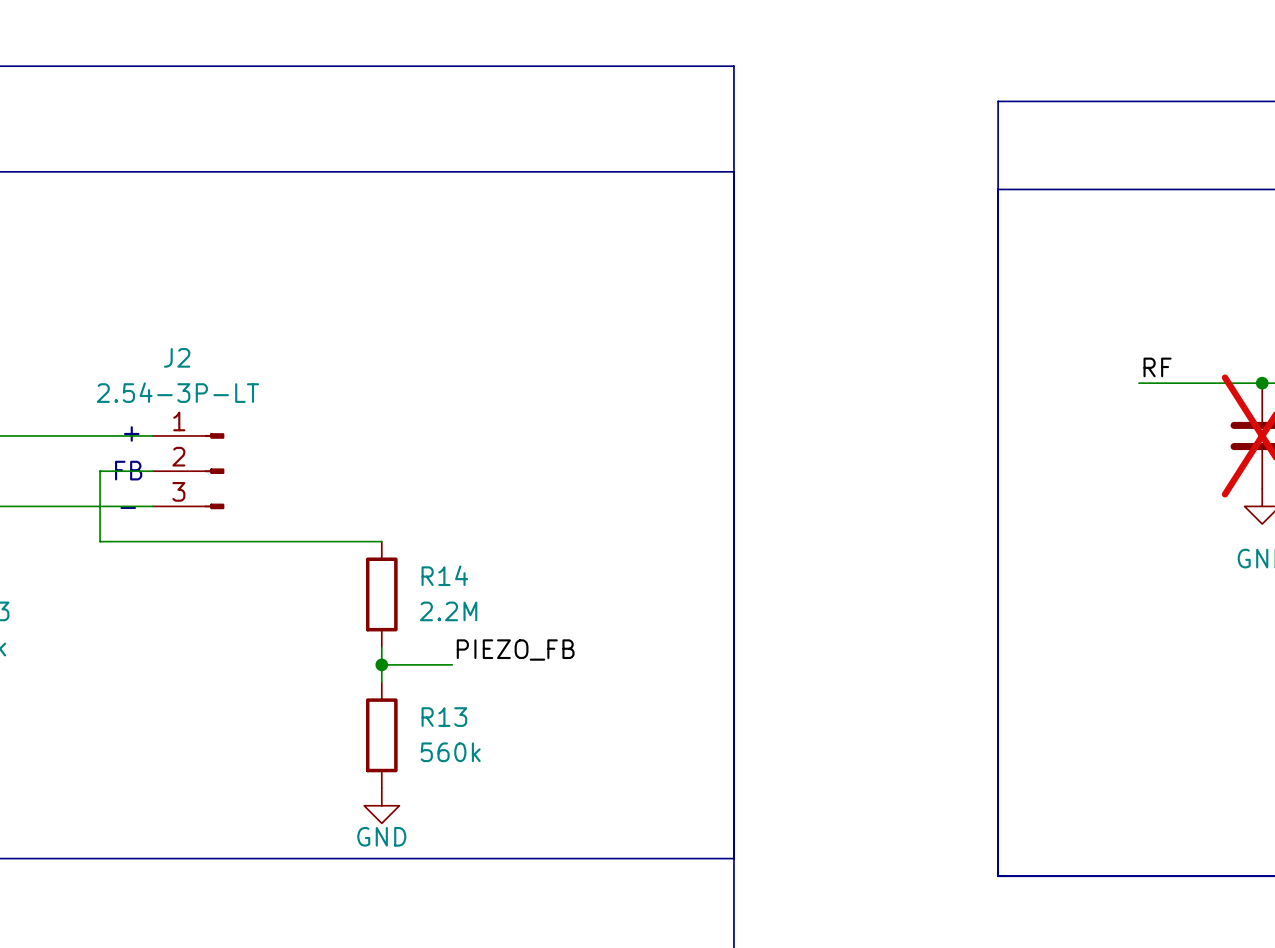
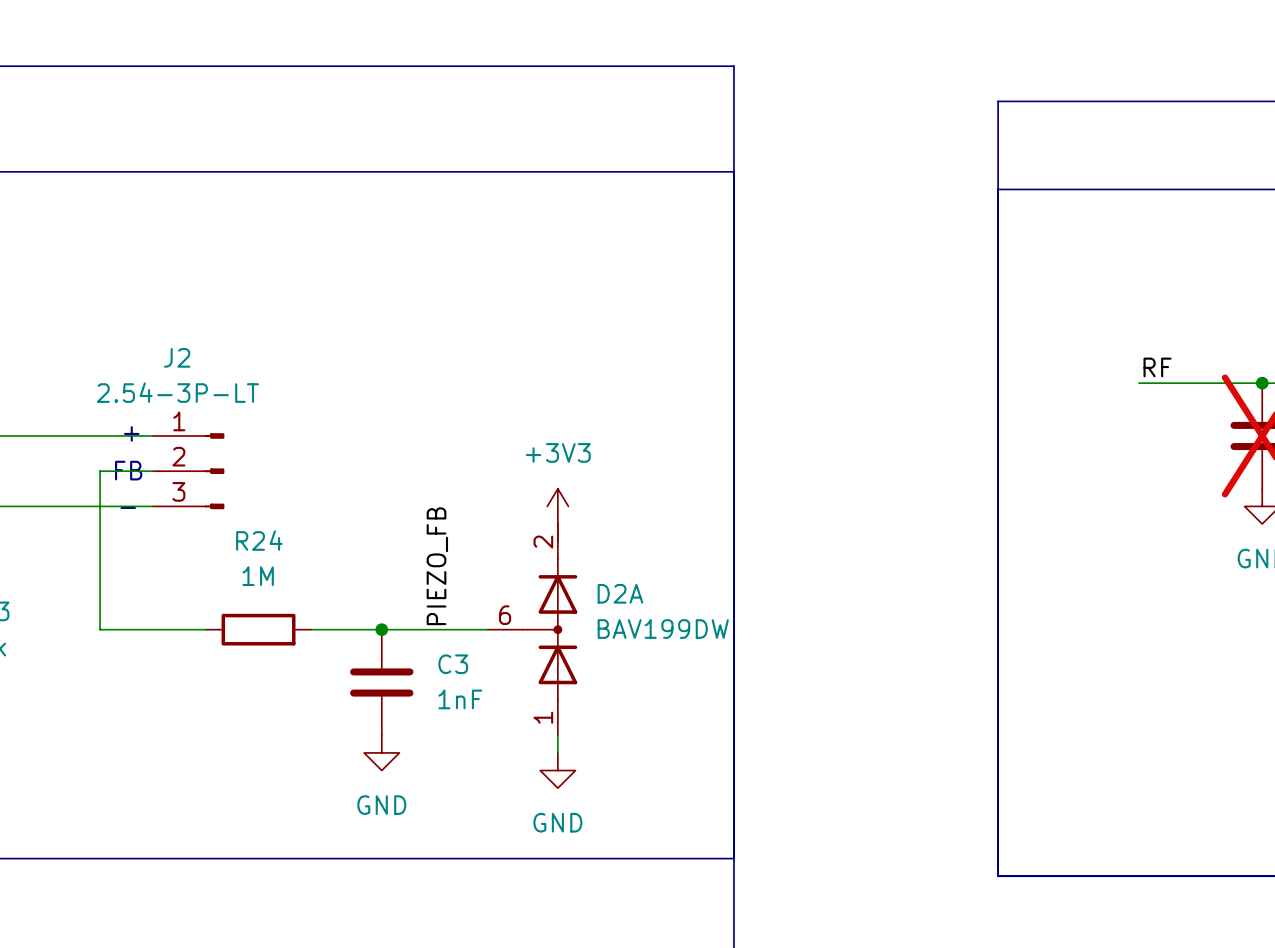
power symbol: none -> +3V3 (557, 506)
wire: (100, 541) (381, 541) -> (100, 541) (100, 629) (205, 629)
R14: 2.2M (381, 594) -> none
R24: none -> 1M (258, 629)
wire: none -> (311, 629) (487, 629)
D2A: none -> BAV199DW (532, 629)
label rotation: 0° (515, 650) -> 90° counterclockwise (437, 566)
wire: (381, 664) (452, 664) -> none
junction position: (381, 664) -> (381, 629)
C3: none -> 1nF (381, 682)
R13: 560k (381, 735) -> none
wire: none -> (557, 735) (557, 752)
power symbol: none -> GND (557, 770)
power symbol position: GND (381, 805) -> GND (381, 752)
power symbol text position: GND (381, 836) -> GND (381, 805)

